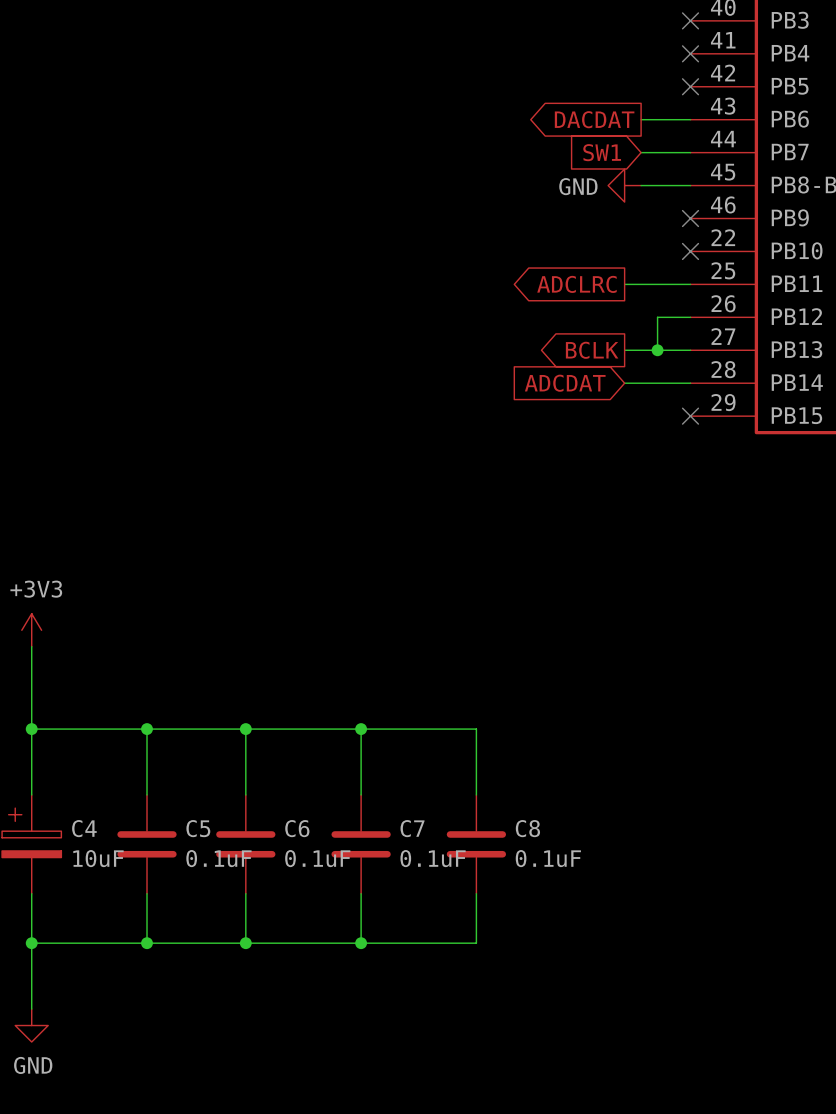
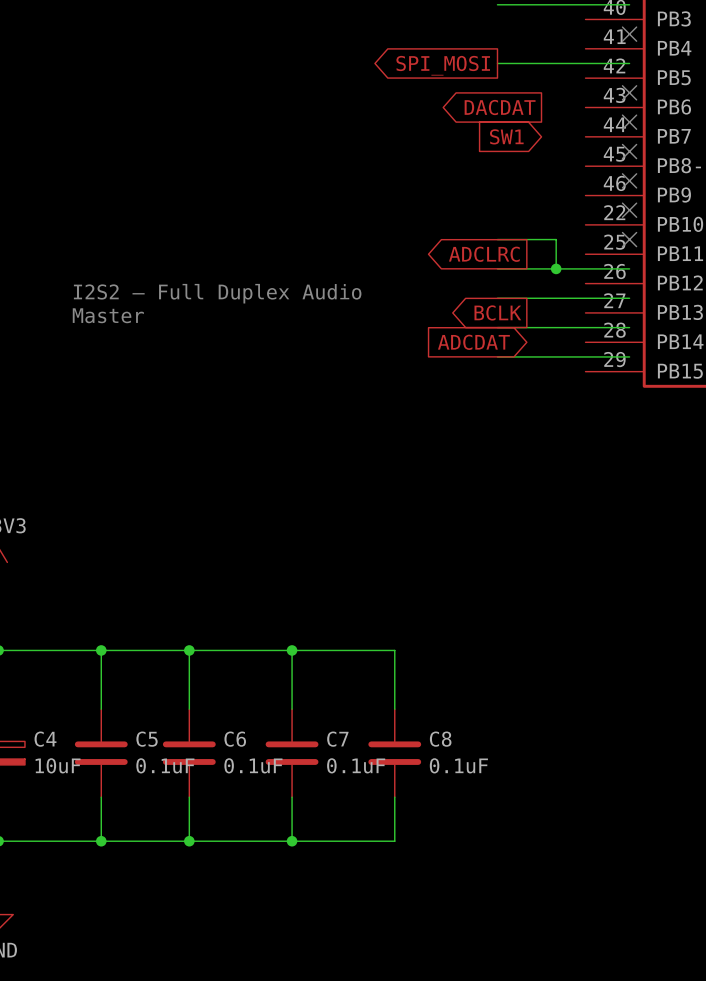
wire: none -> (497, 4) (629, 4)
no-connect mark: (690, 20) -> none
no-connect mark: none -> (629, 34)
no-connect mark: (690, 53) -> none
wire: none -> (497, 63) (629, 63)
global label: none -> SPI_MOSI (443, 65)
no-connect mark: (690, 86) -> none
no-connect mark: none -> (629, 92)
wire: (641, 119) (690, 119) -> none
no-connect mark: none -> (629, 122)
wire: (641, 152) (690, 152) -> none
no-connect mark: none -> (629, 151)
power symbol: GND (624, 185) -> none
wire: (641, 185) (690, 185) -> none
no-connect mark: none -> (629, 180)
no-connect mark: (690, 218) -> none
no-connect mark: none -> (629, 210)
no-connect mark: (690, 251) -> none
wire: none -> (497, 239) (556, 239) (556, 268)
no-connect mark: none -> (629, 239)
wire: (624, 284) (690, 284) -> none
wire: none -> (497, 268) (629, 268)
wire: (690, 317) (657, 317) (657, 350) -> none
text: none -> I2S2 — Full Duplex Audio (217, 293)
wire: none -> (497, 298) (629, 298)
wire: (624, 350) (690, 350) -> none
junction position: (657, 350) -> (556, 268)
text: none -> Master (108, 315)
wire: none -> (497, 327) (629, 327)
wire: (624, 383) (690, 383) -> none
wire: none -> (497, 356) (629, 356)
no-connect mark: (690, 416) -> none

